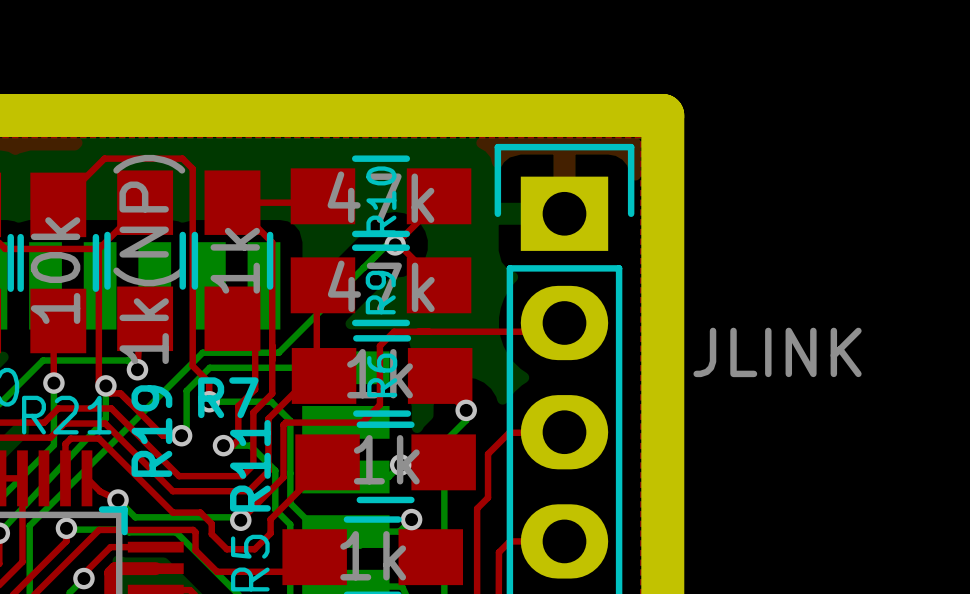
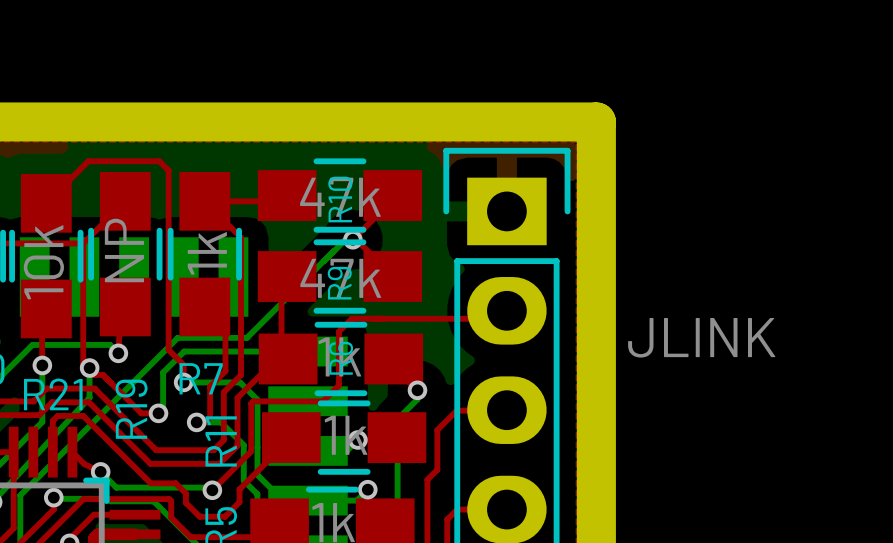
R19 value: 1k(NP) (149, 259) -> NP (124, 250)

